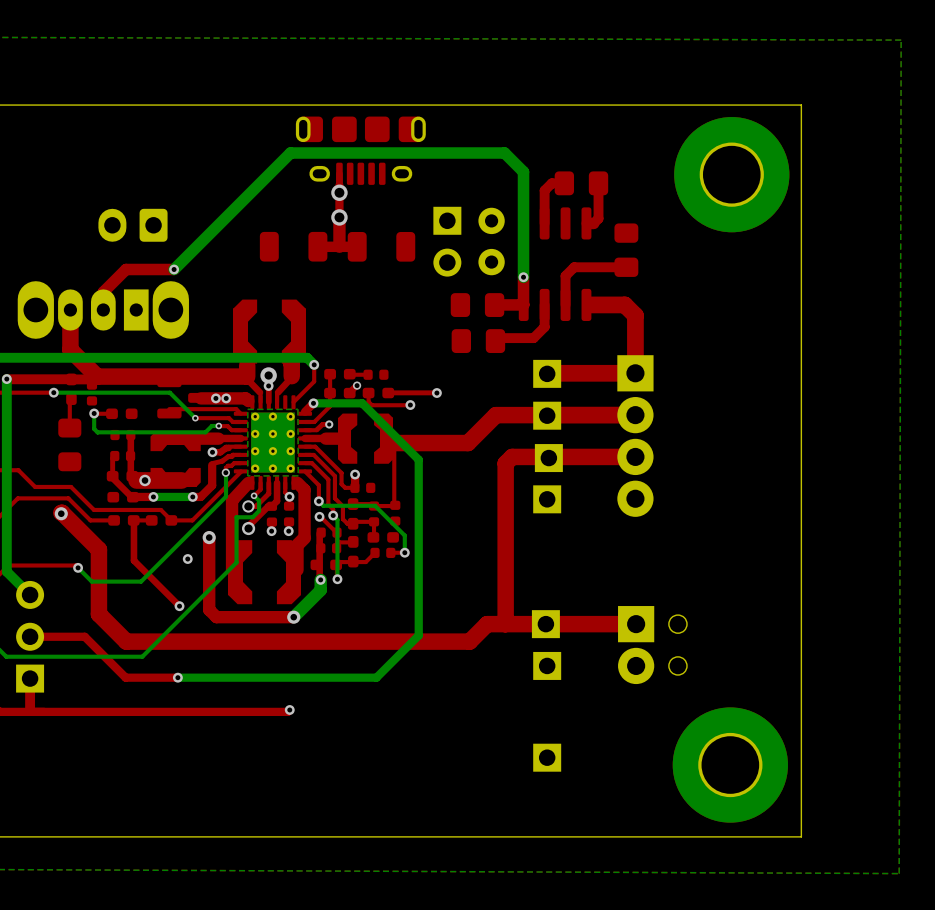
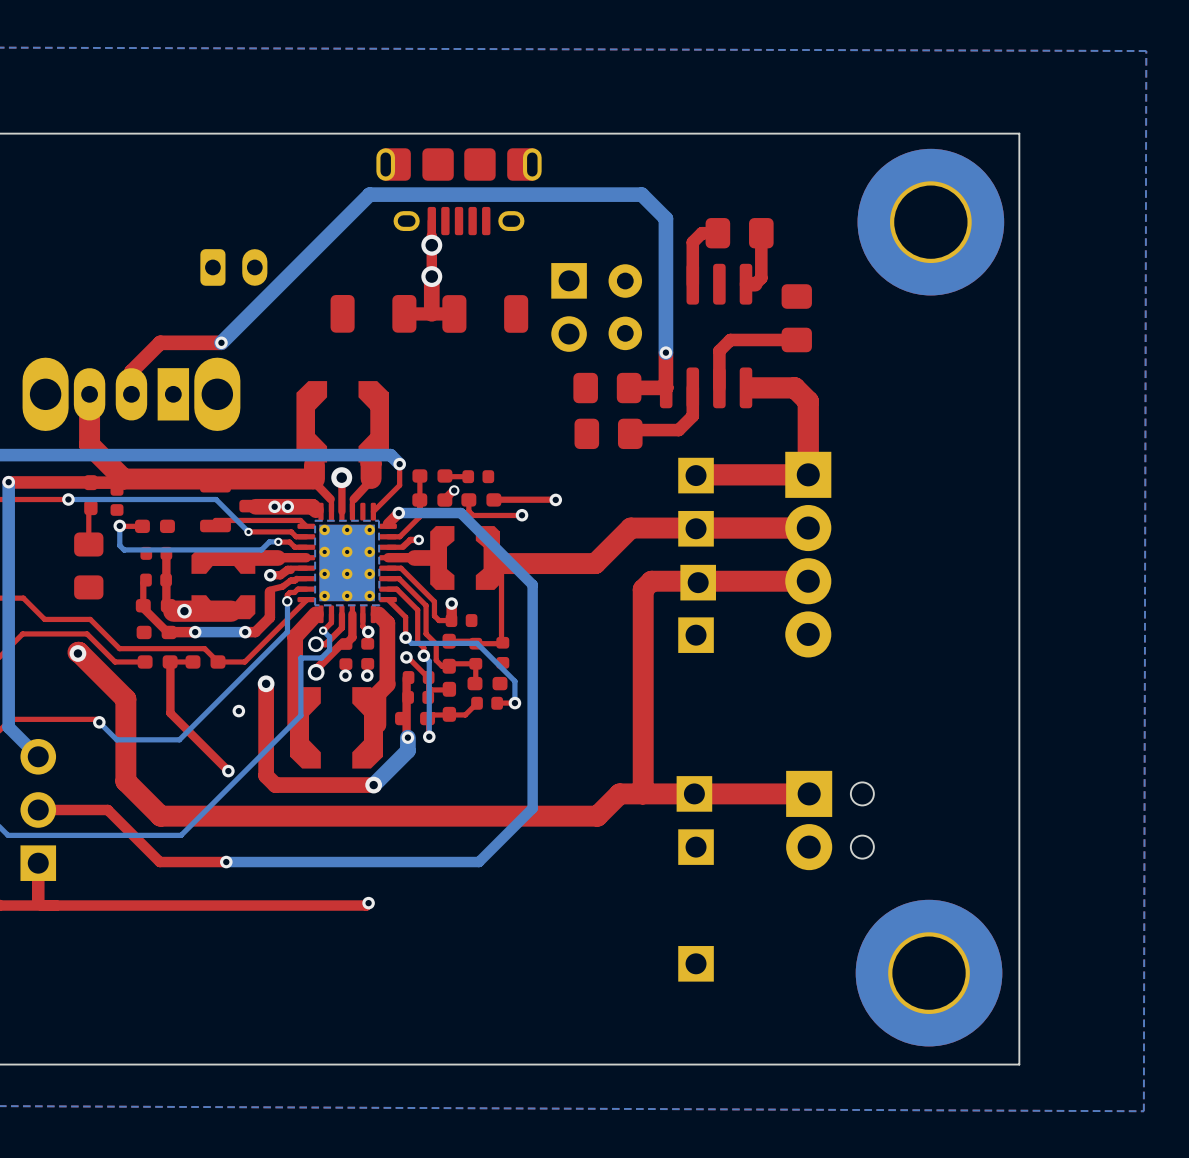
part: none -> (233, 267)
part: (132, 225) -> none
via: (268, 385) -> none

